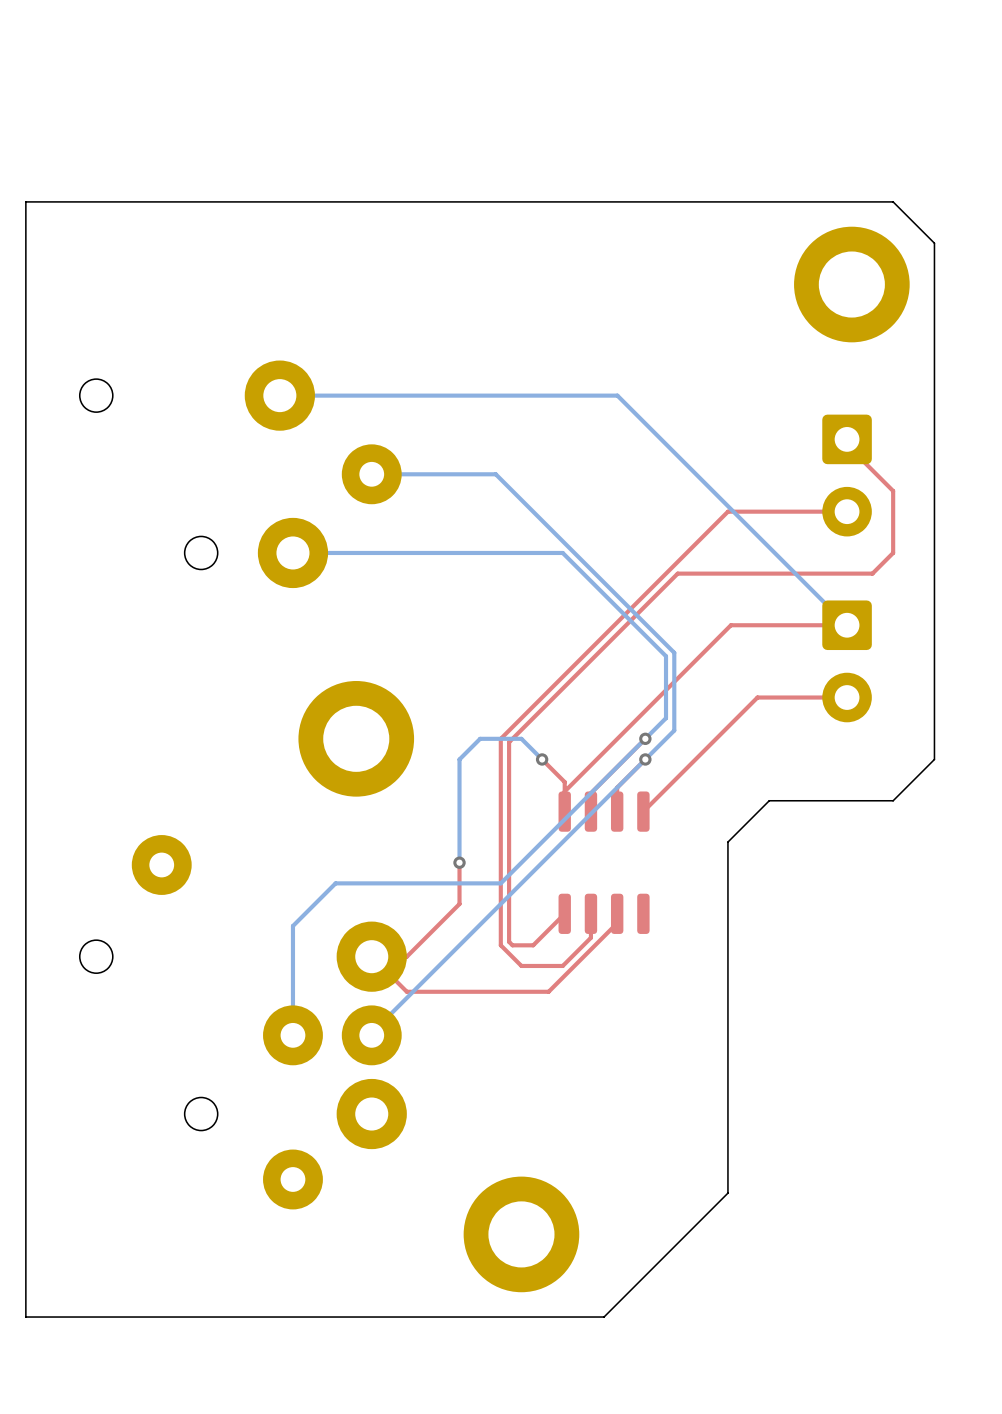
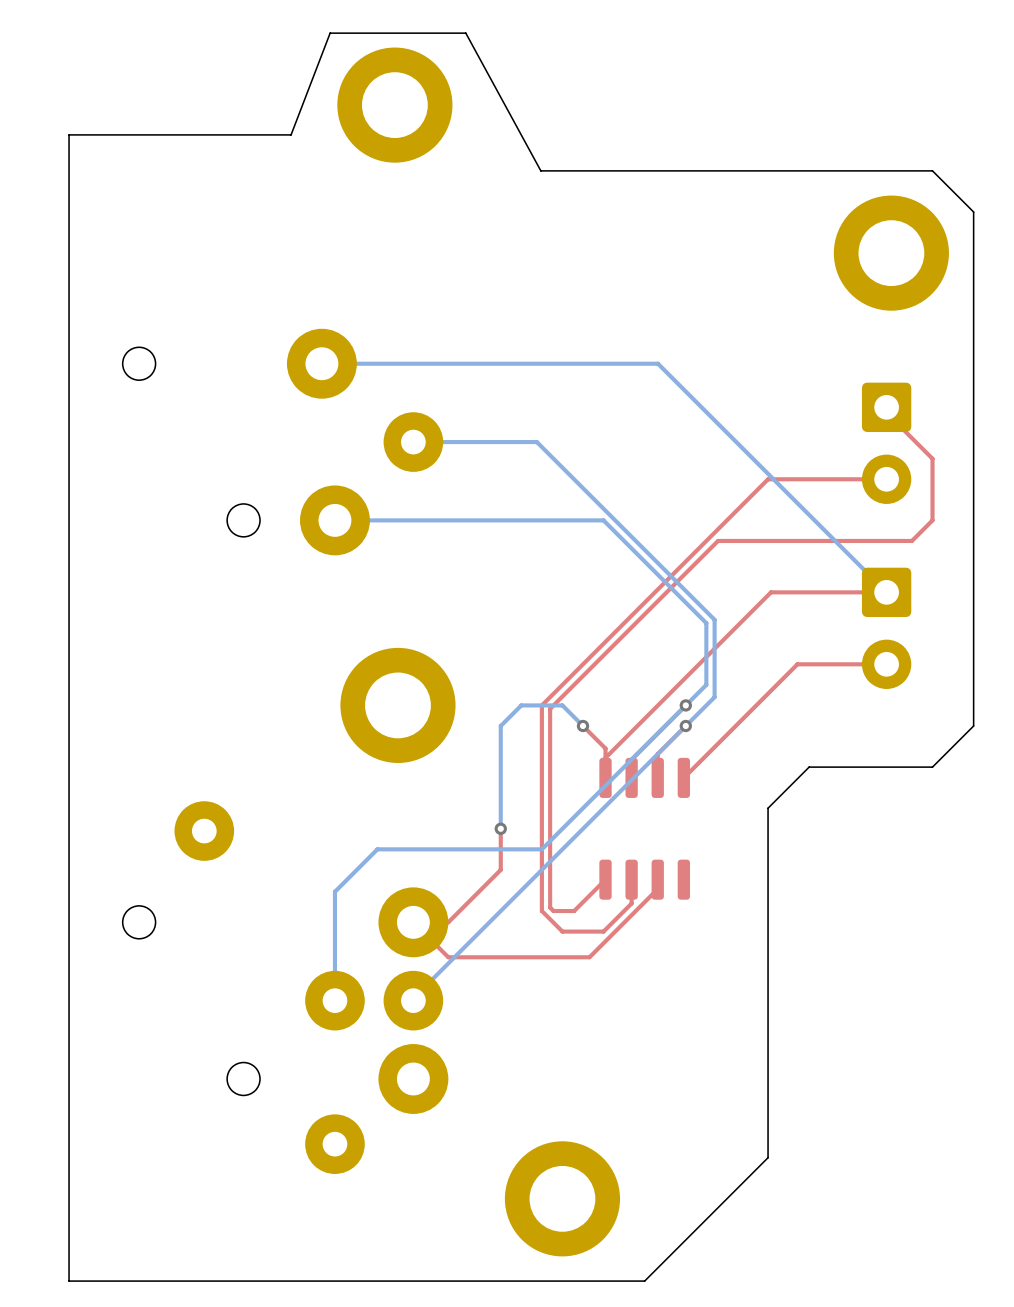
part: none -> (394, 105)
board edge: (499, 201) (25, 201) -> (540, 170) (465, 33) (330, 33) (291, 134) (69, 134) (69, 170)

